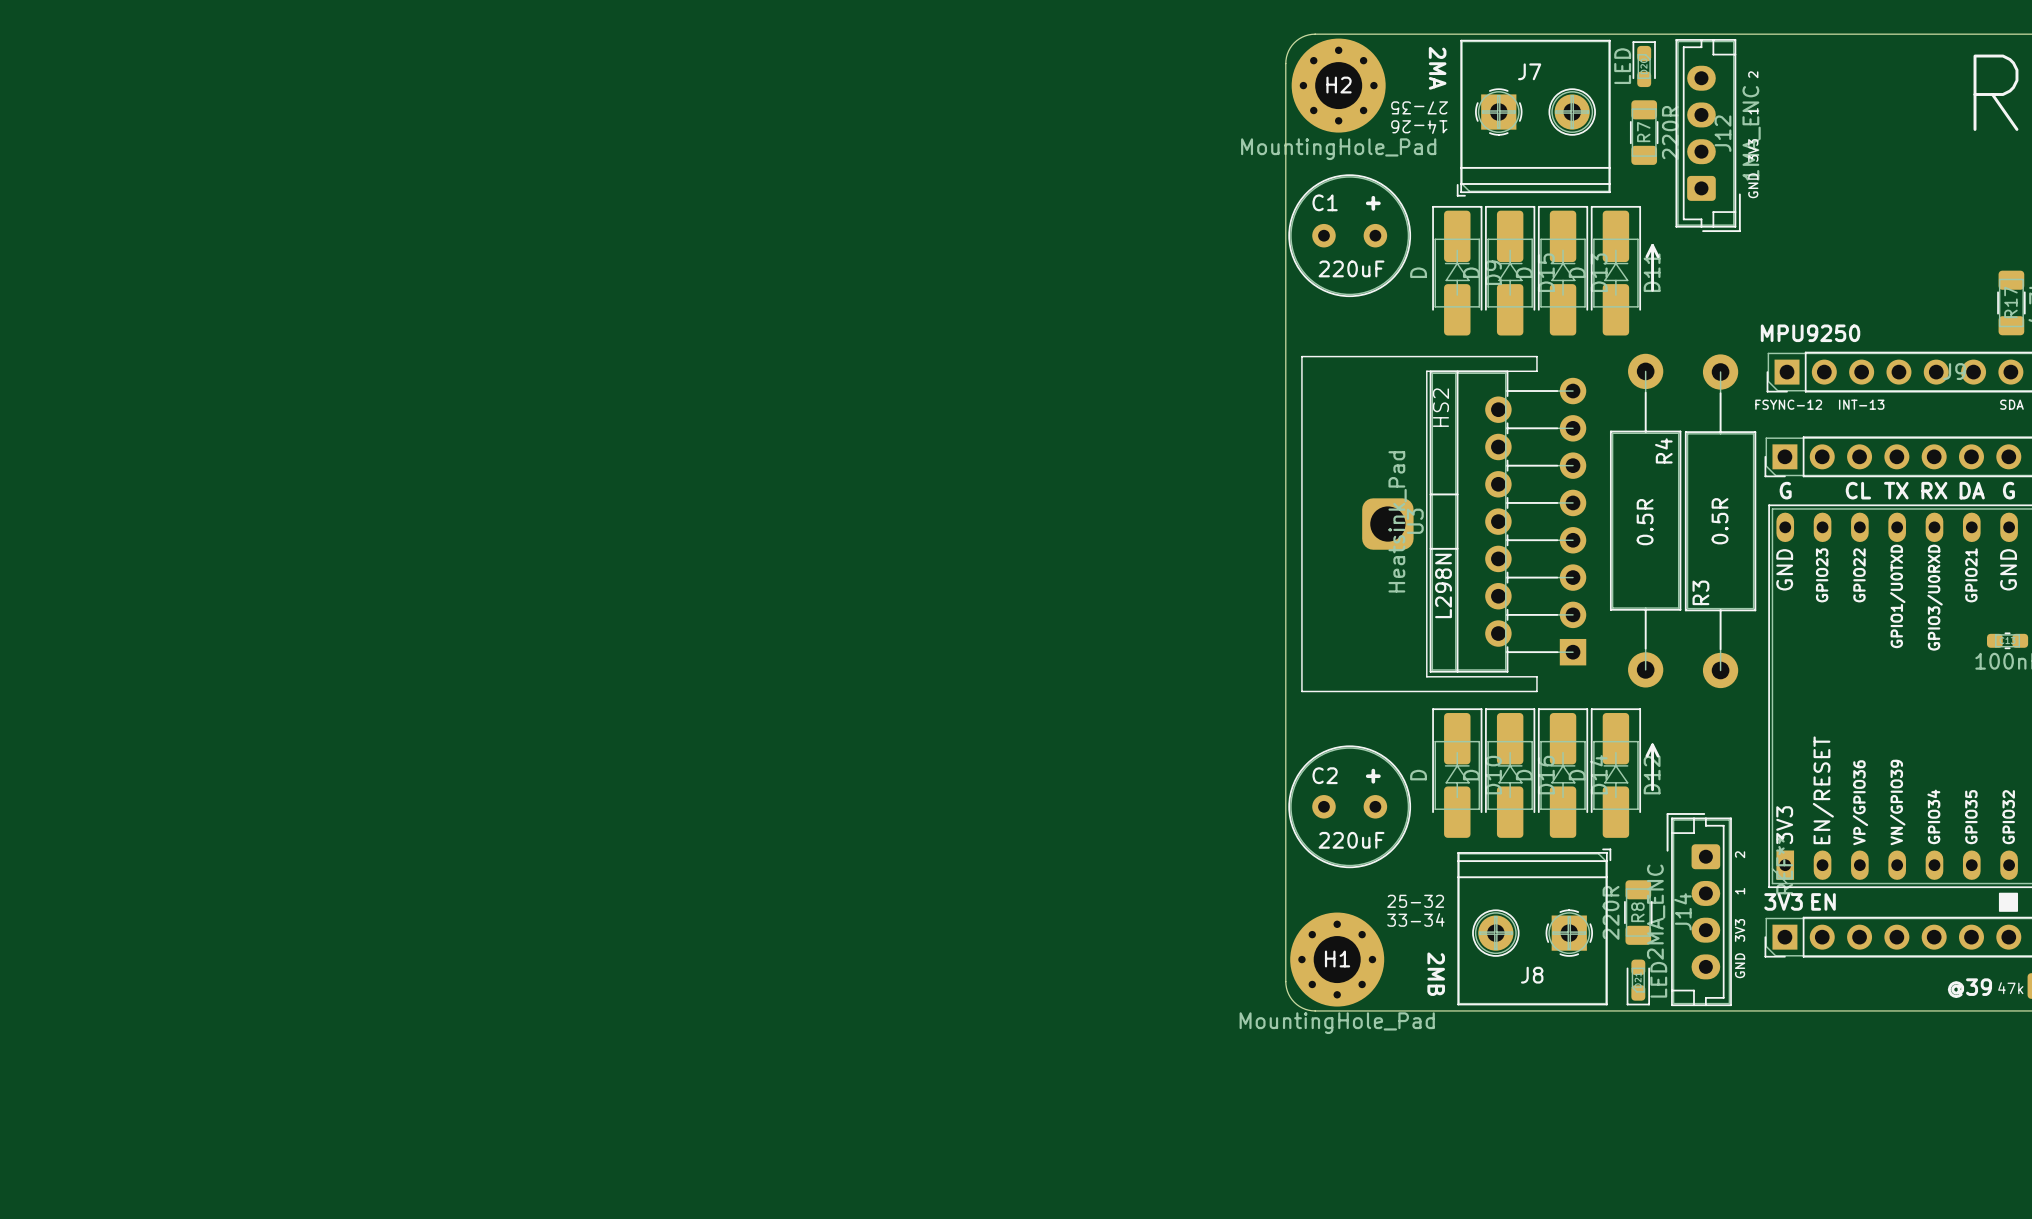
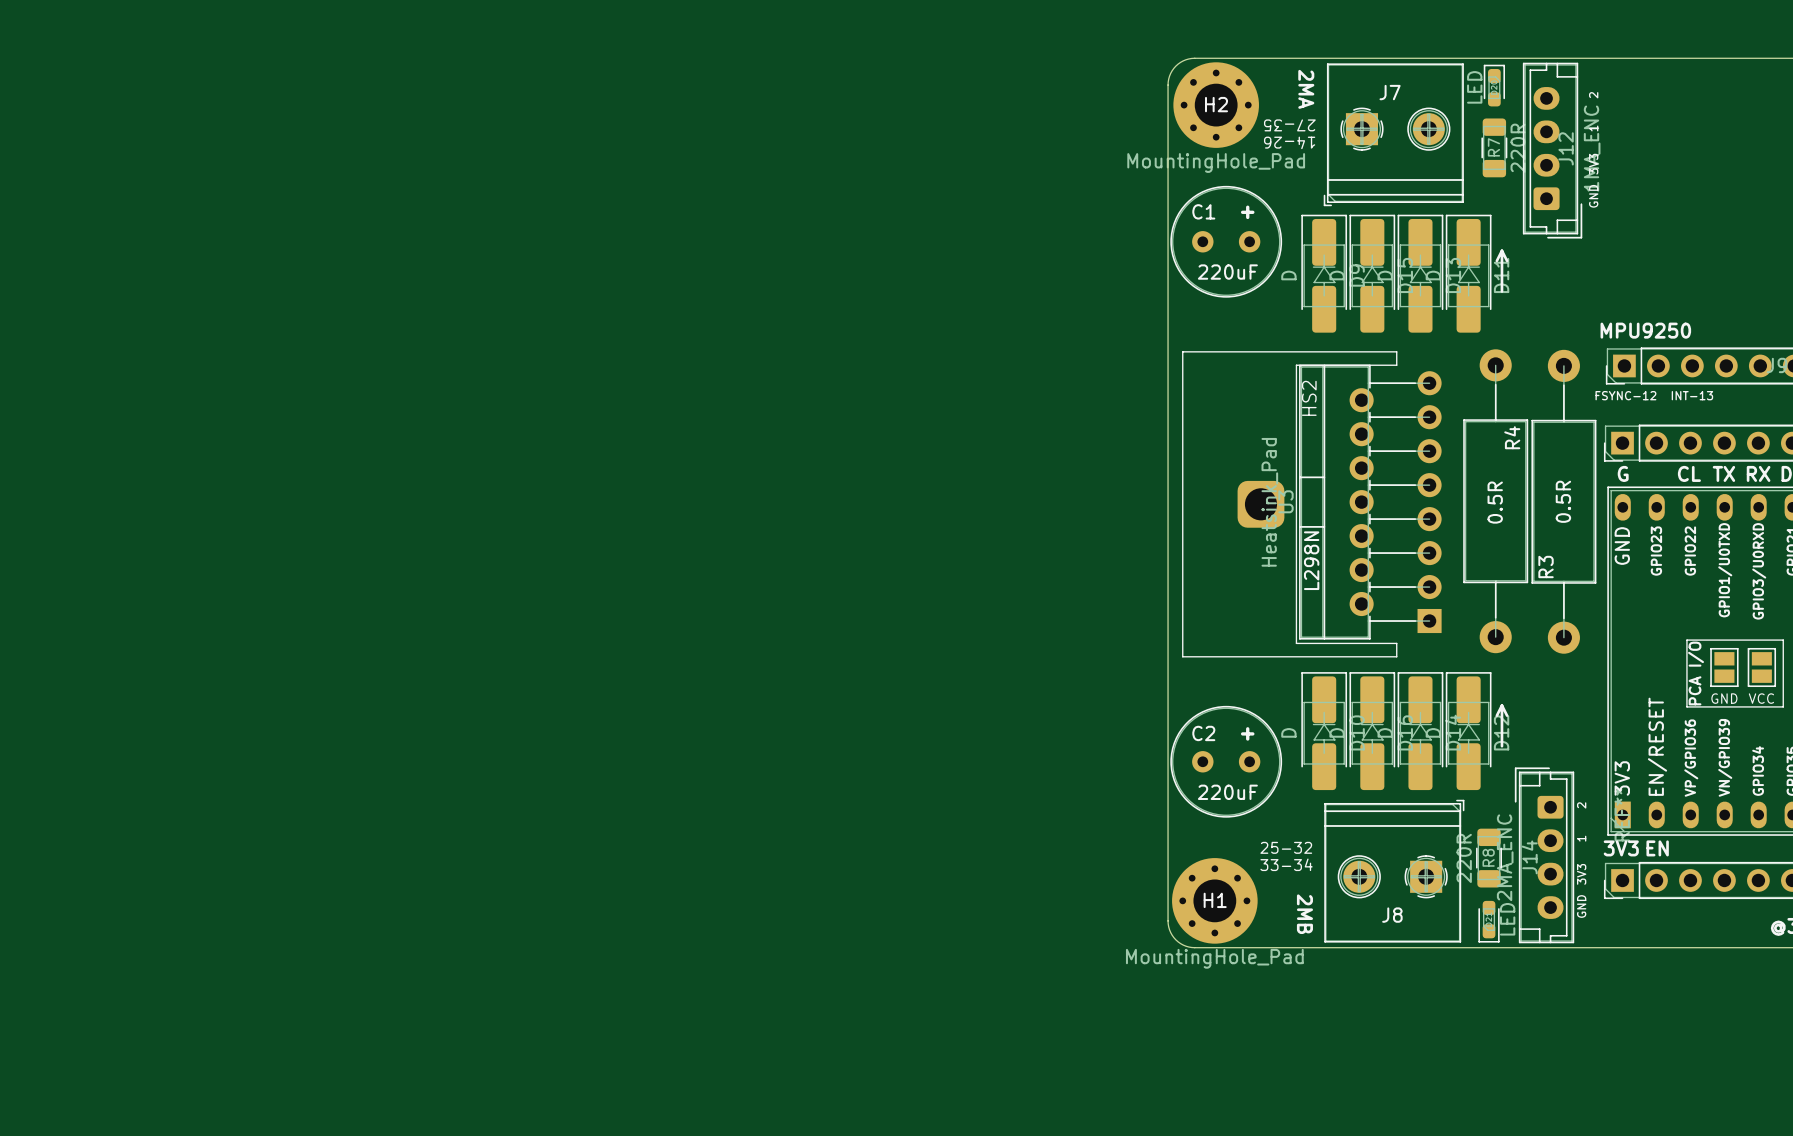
line: none -> (1686, 640) (1783, 640) (1783, 706) (1686, 706) (1686, 640)
part: none -> GND (1724, 667)
part: none -> VCC (1761, 667)
text: none -> PCA I/O (1696, 673)

